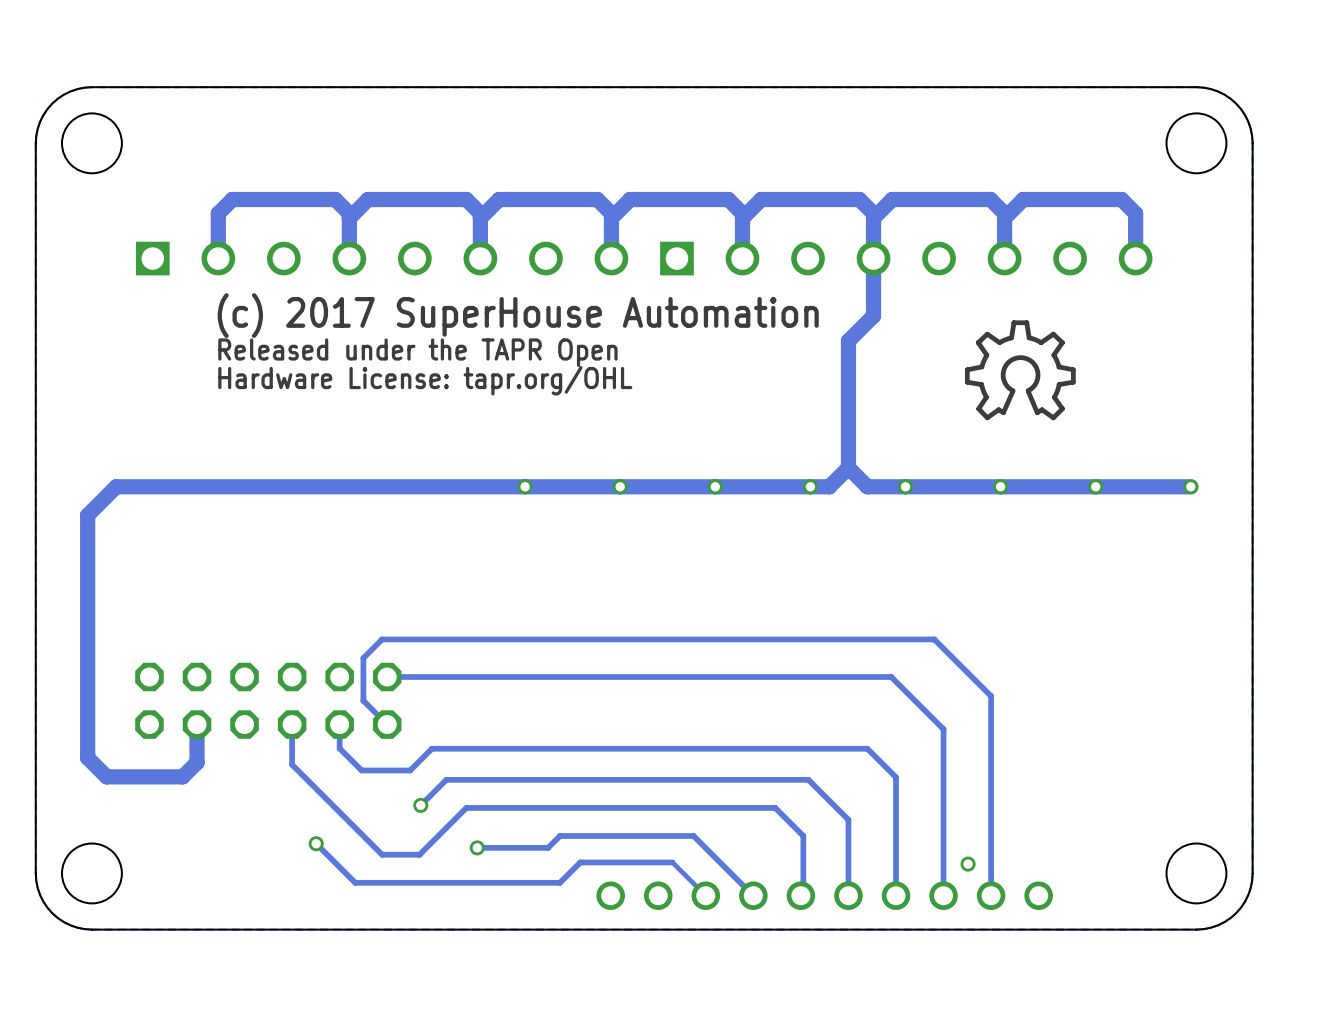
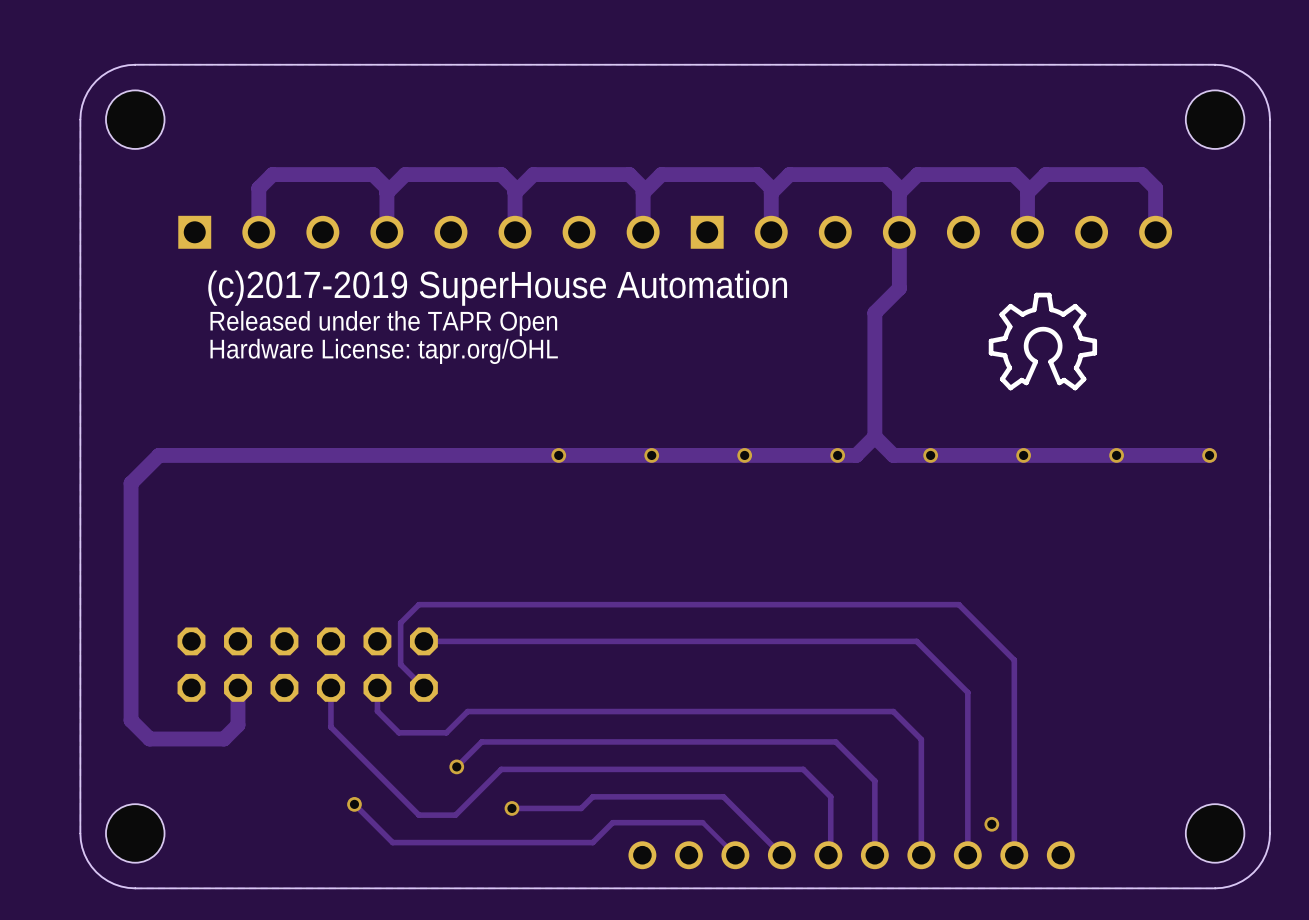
text: (c) 2017 SuperHouse Automation (518, 315) -> (c)2017-2019 SuperHouse Automation (497, 288)
text position: Released under the TAPR Open (417, 352) -> Released under the TAPR Open (383, 323)
text position: Hardware License: tapr.org/OHL (425, 380) -> Hardware License: tapr.org/OHL (384, 351)

